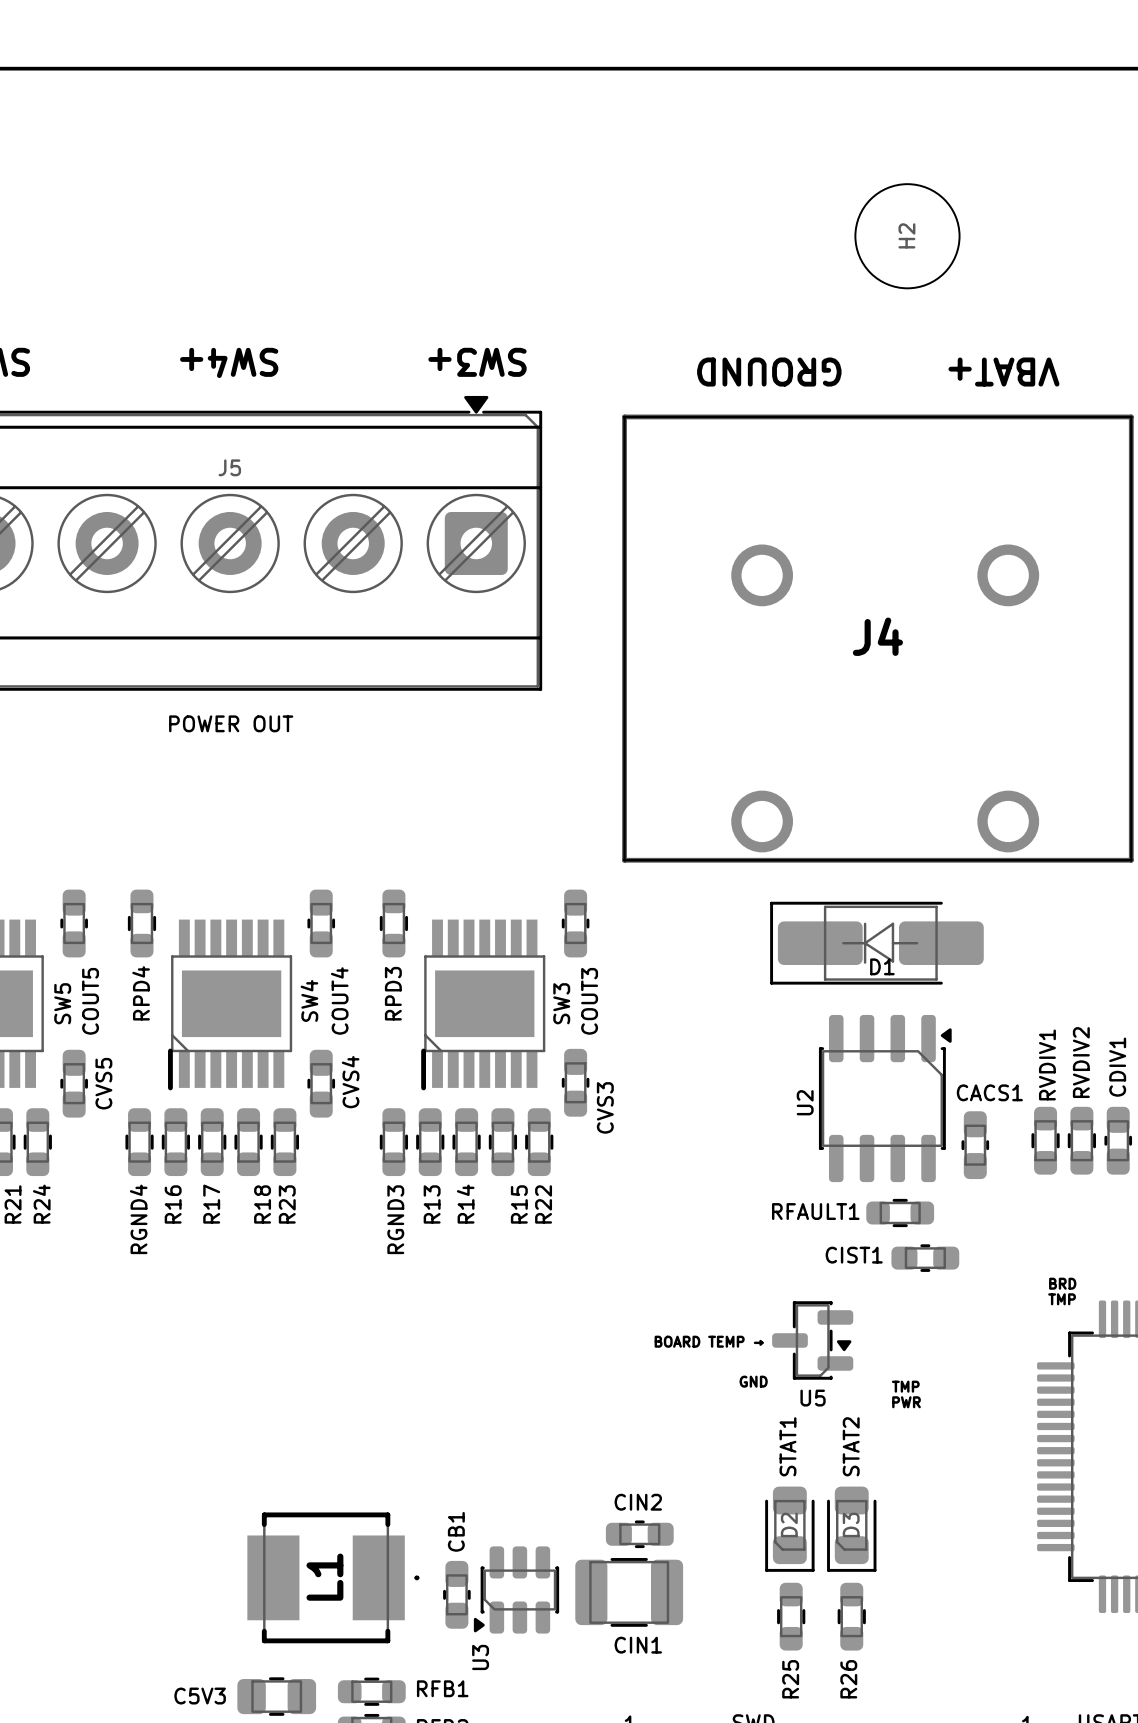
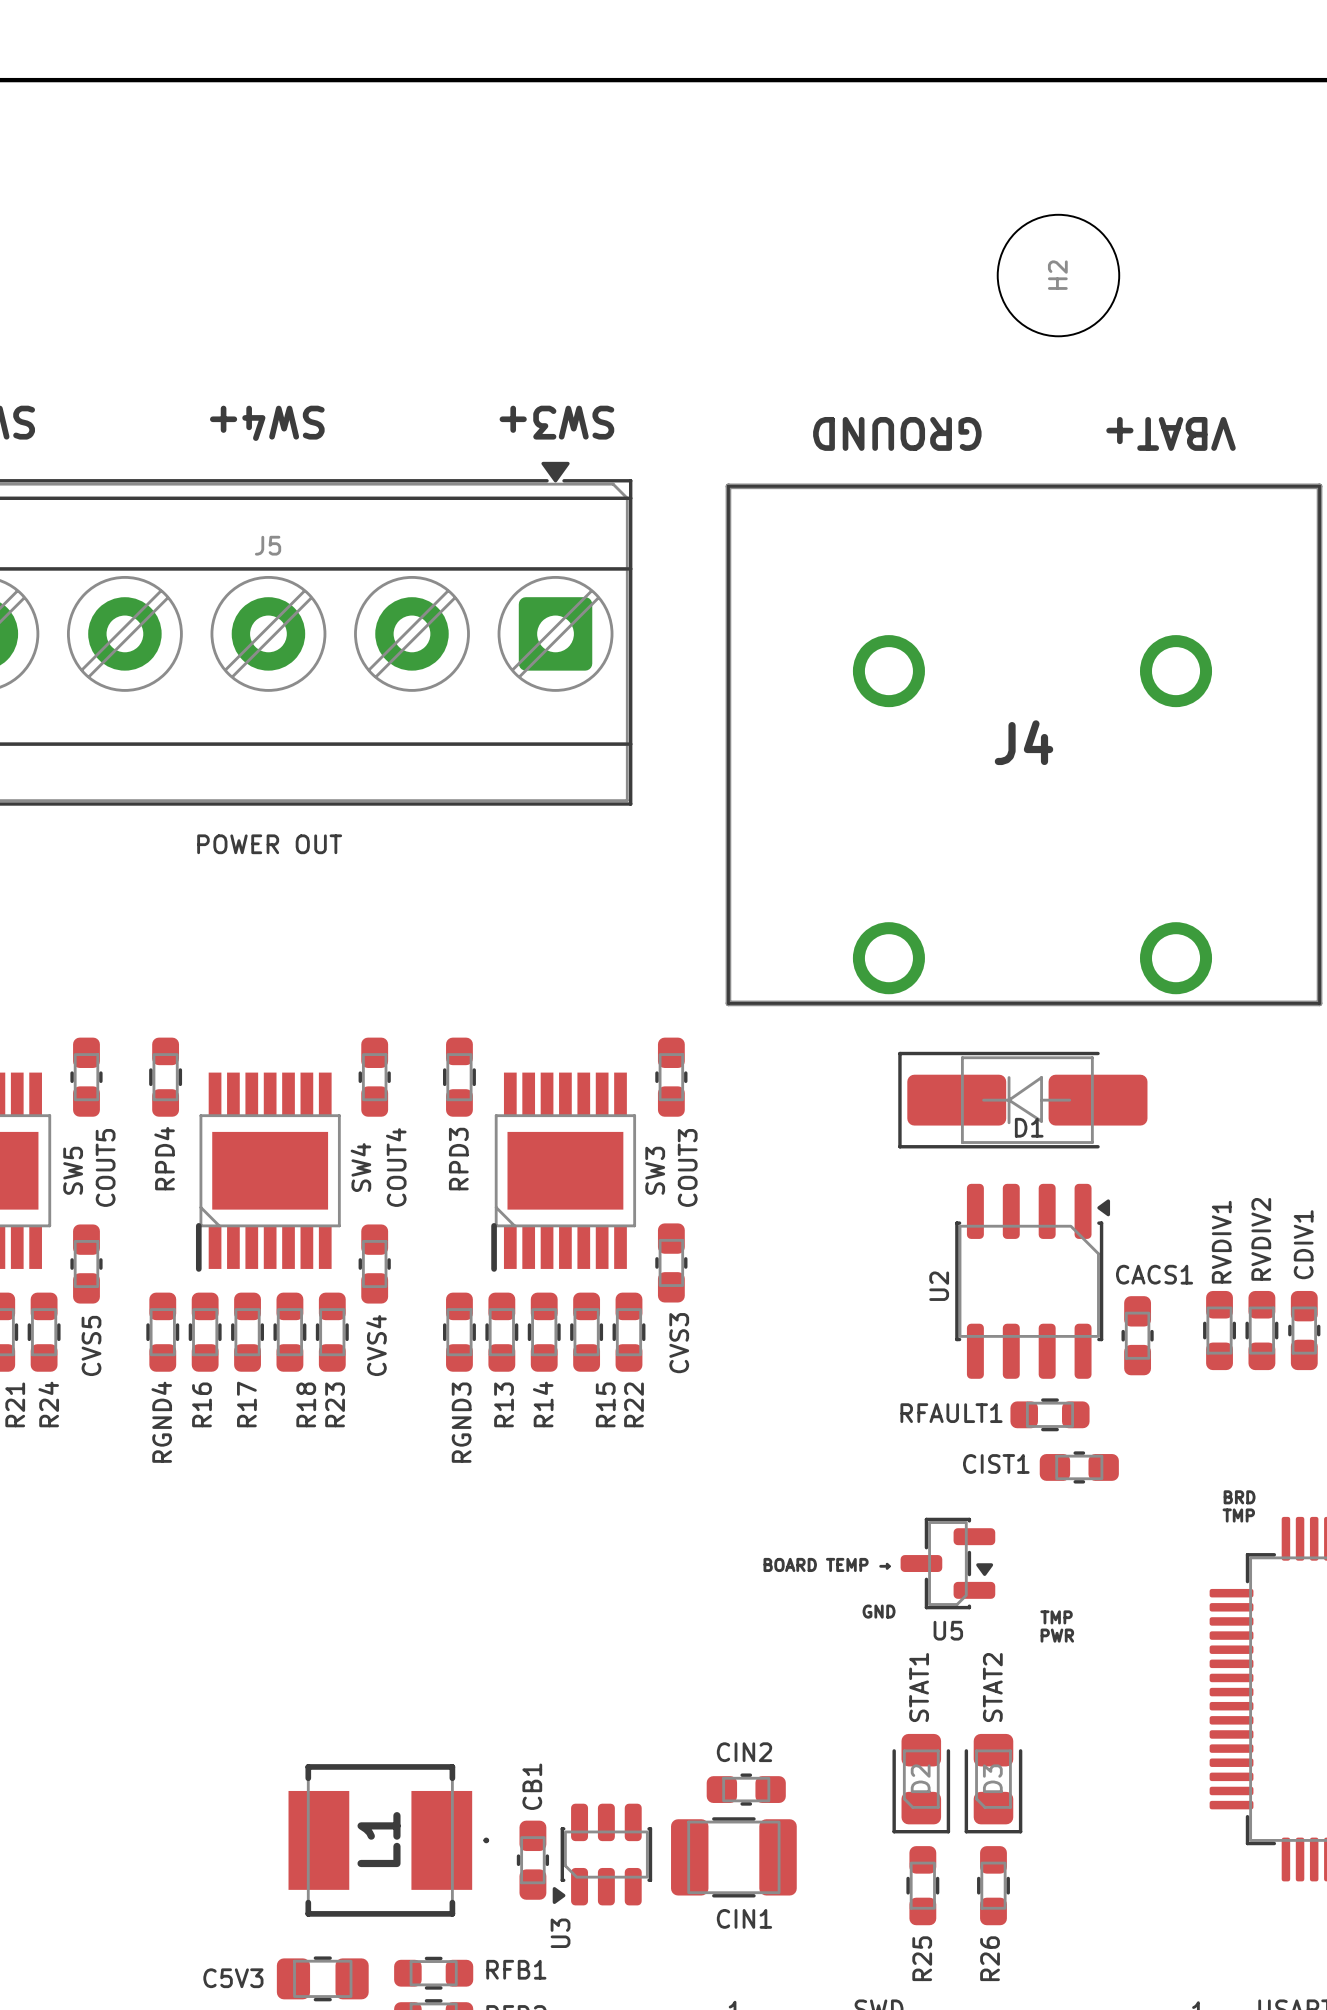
CVS4 name position: CVS4 (350, 1082) -> CVS4 (376, 1345)
CVS5 name position: CVS5 (103, 1083) -> CVS5 (91, 1345)
CVS3 name position: CVS3 (605, 1107) -> CVS3 (679, 1343)

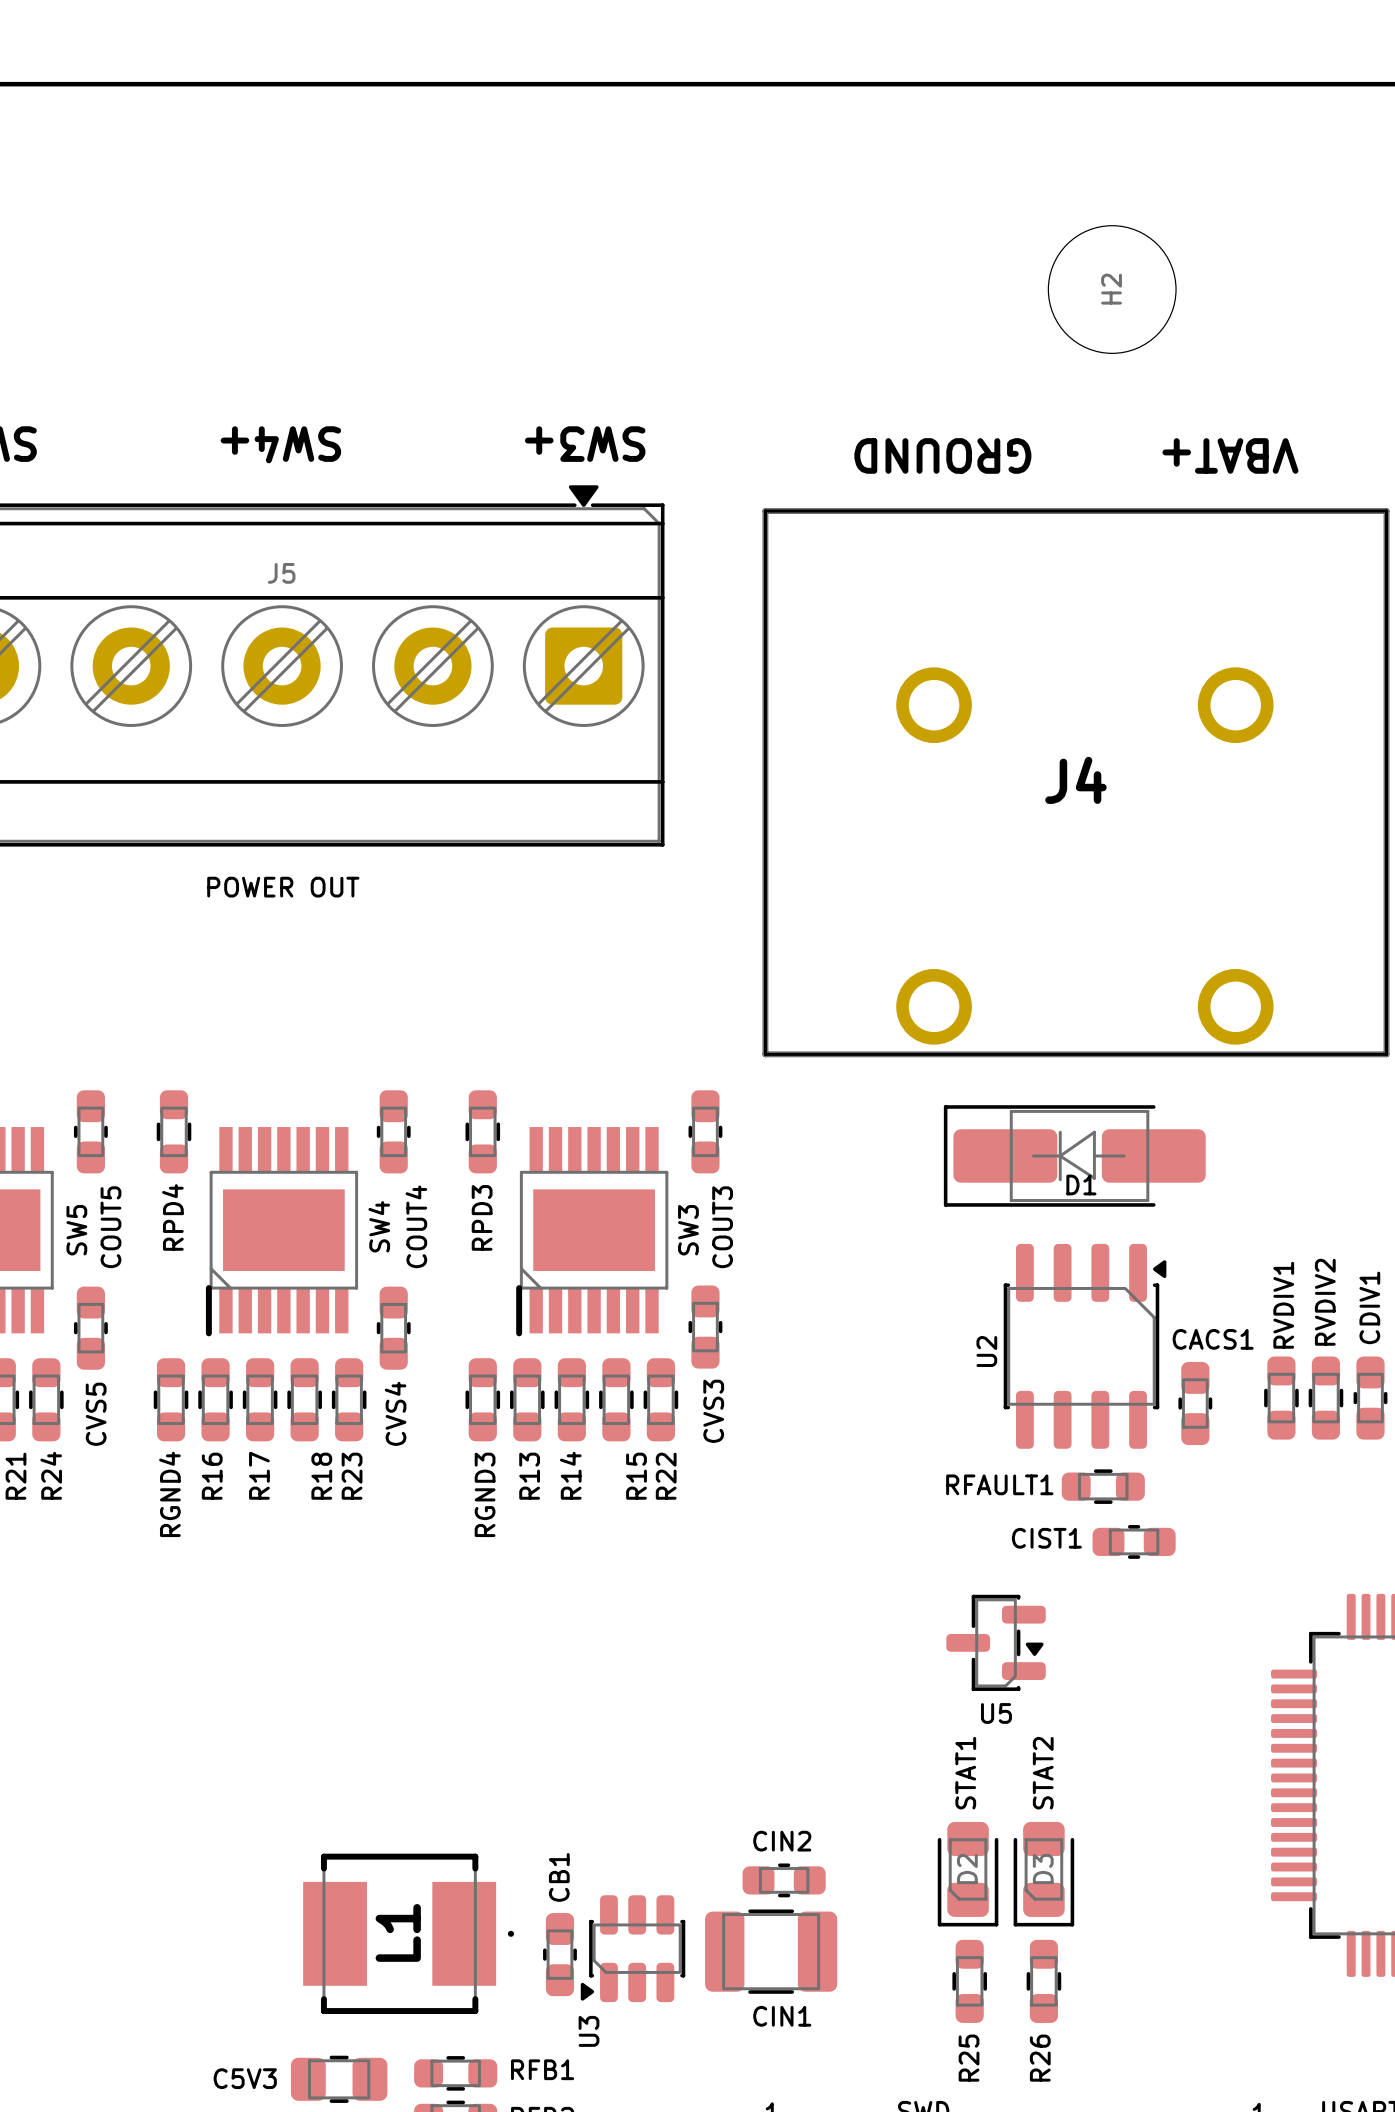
text: BRD (1239, 1497) -> none
text: TMP (1238, 1515) -> none
text: BOARD TEMP → (827, 1564) -> none
text: GND (879, 1611) -> none
text: TMP (1056, 1617) -> none
text: PWR (1057, 1635) -> none

